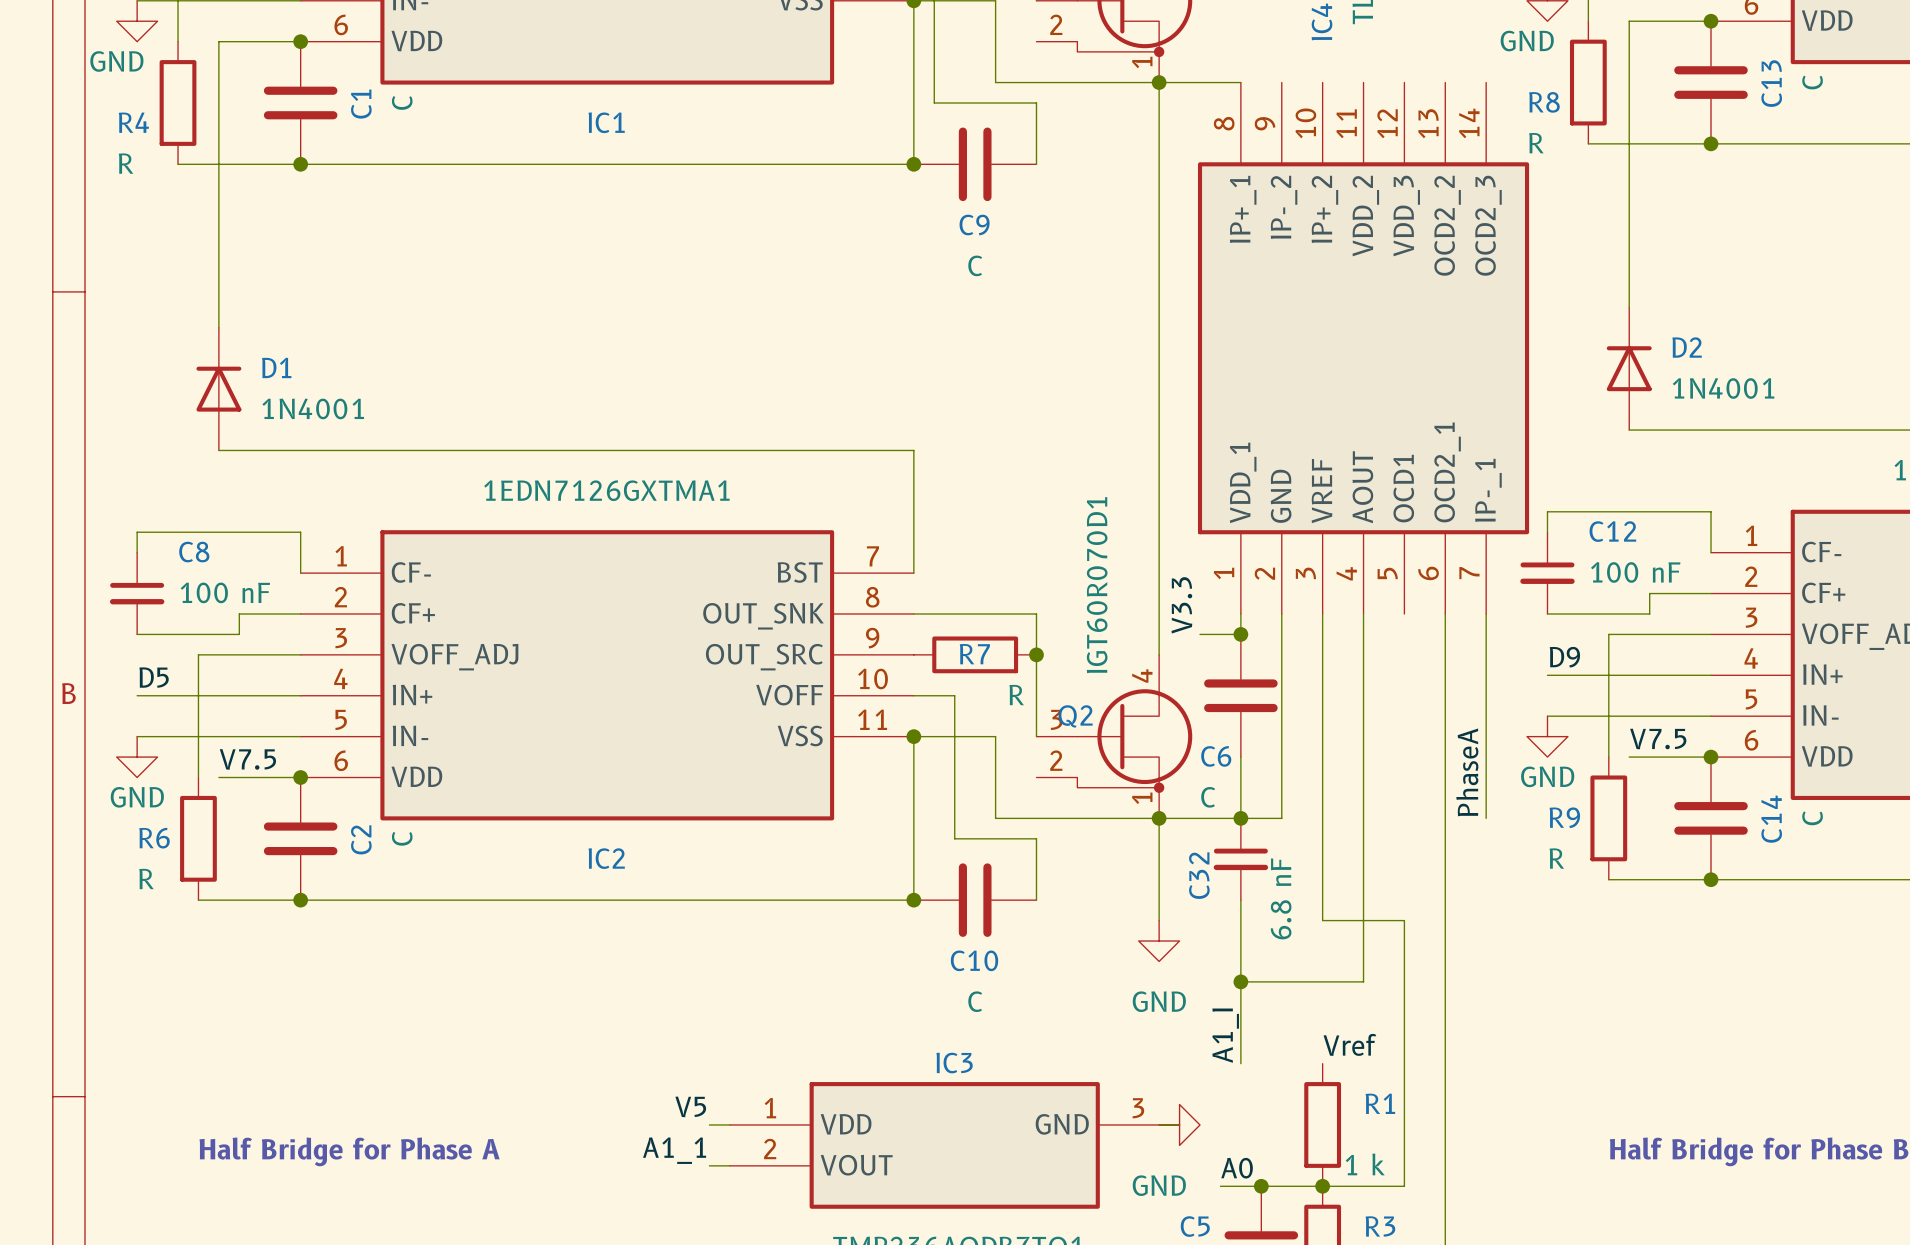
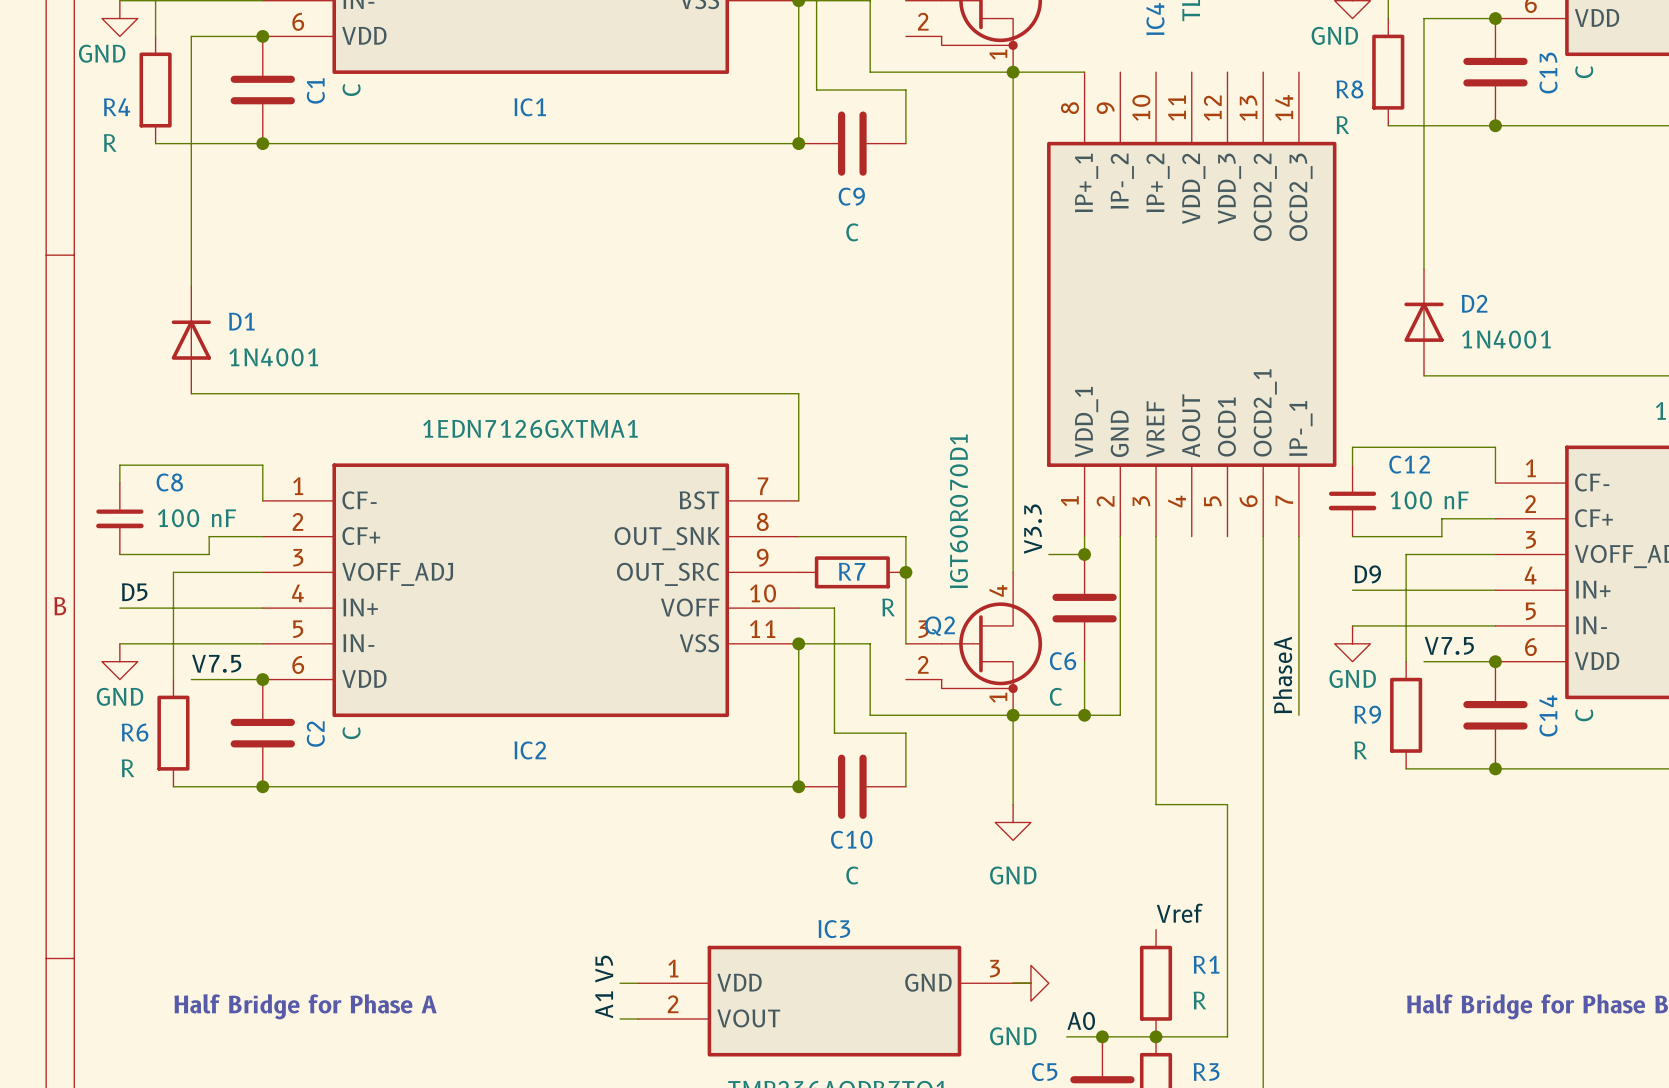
wire: (1363, 613) (1363, 981) (1240, 981) -> none
C32: 6.8 nF (1240, 859) -> none
wire: (1240, 900) (1240, 1063) -> none
junction: (1240, 981) -> none
label: A1_I (1225, 1035) -> none
label rotation: 0° (690, 1106) -> 90° counterclockwise (604, 969)
label: A1_1 (674, 1150) -> A1 (604, 1004)
R1 value: 1 k (1365, 1164) -> R (1199, 1000)

